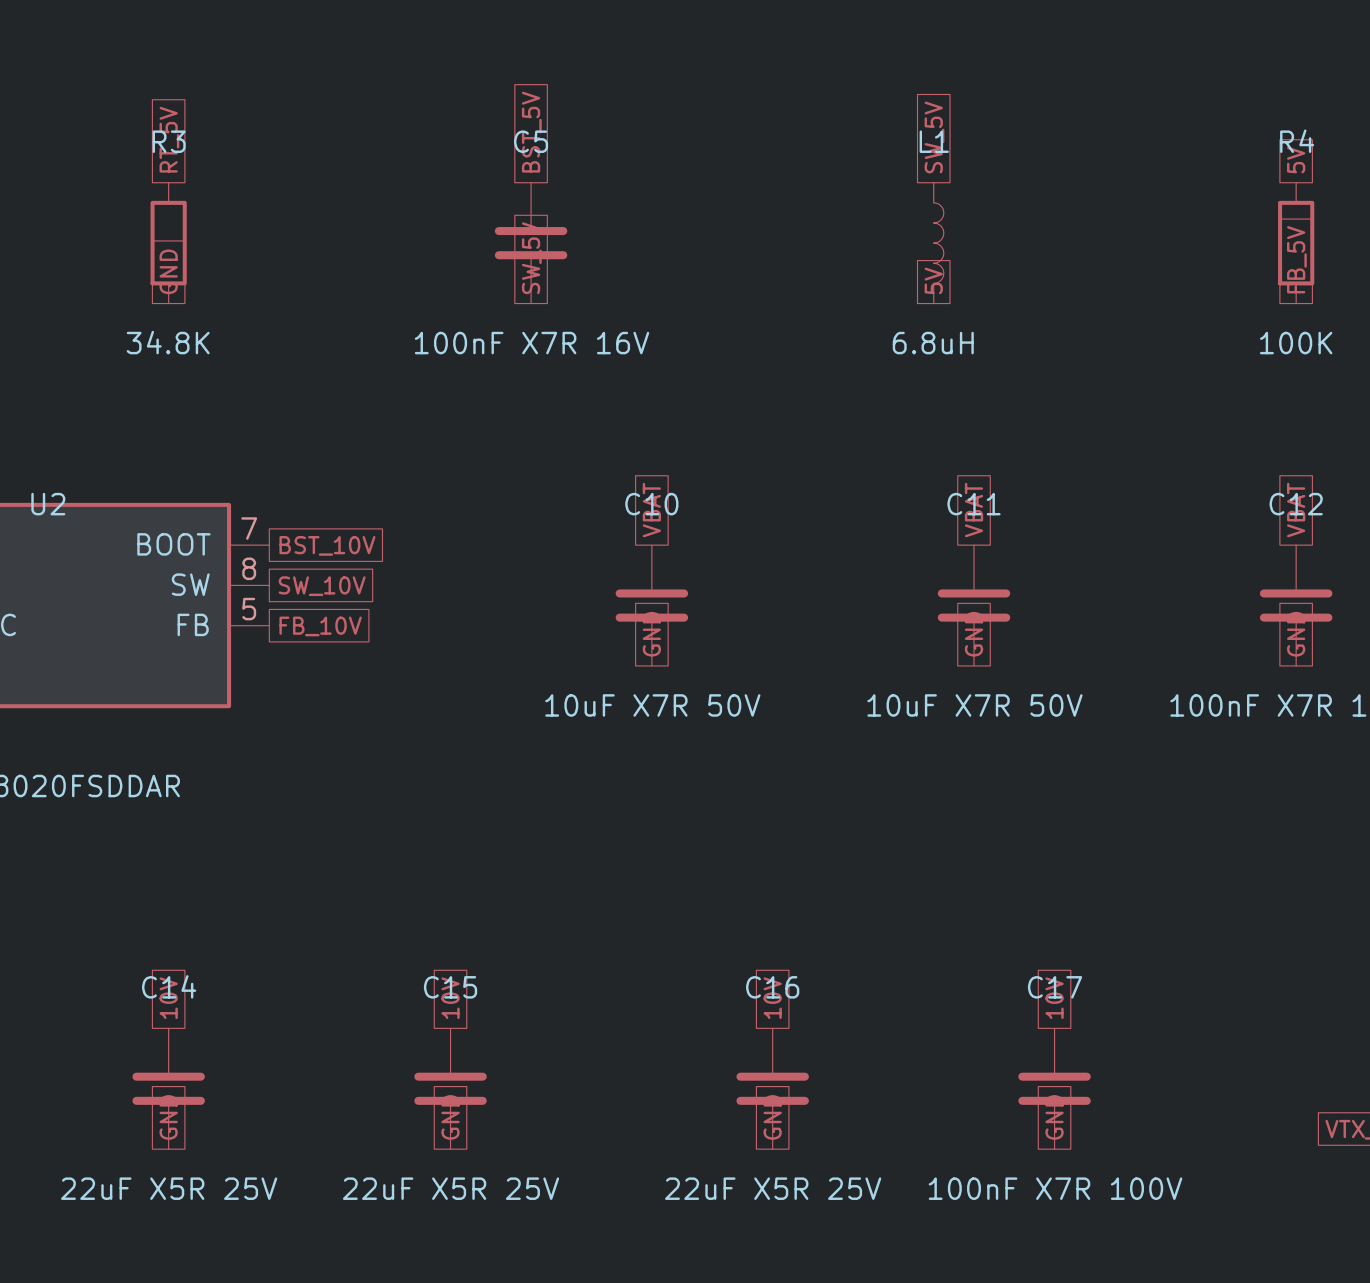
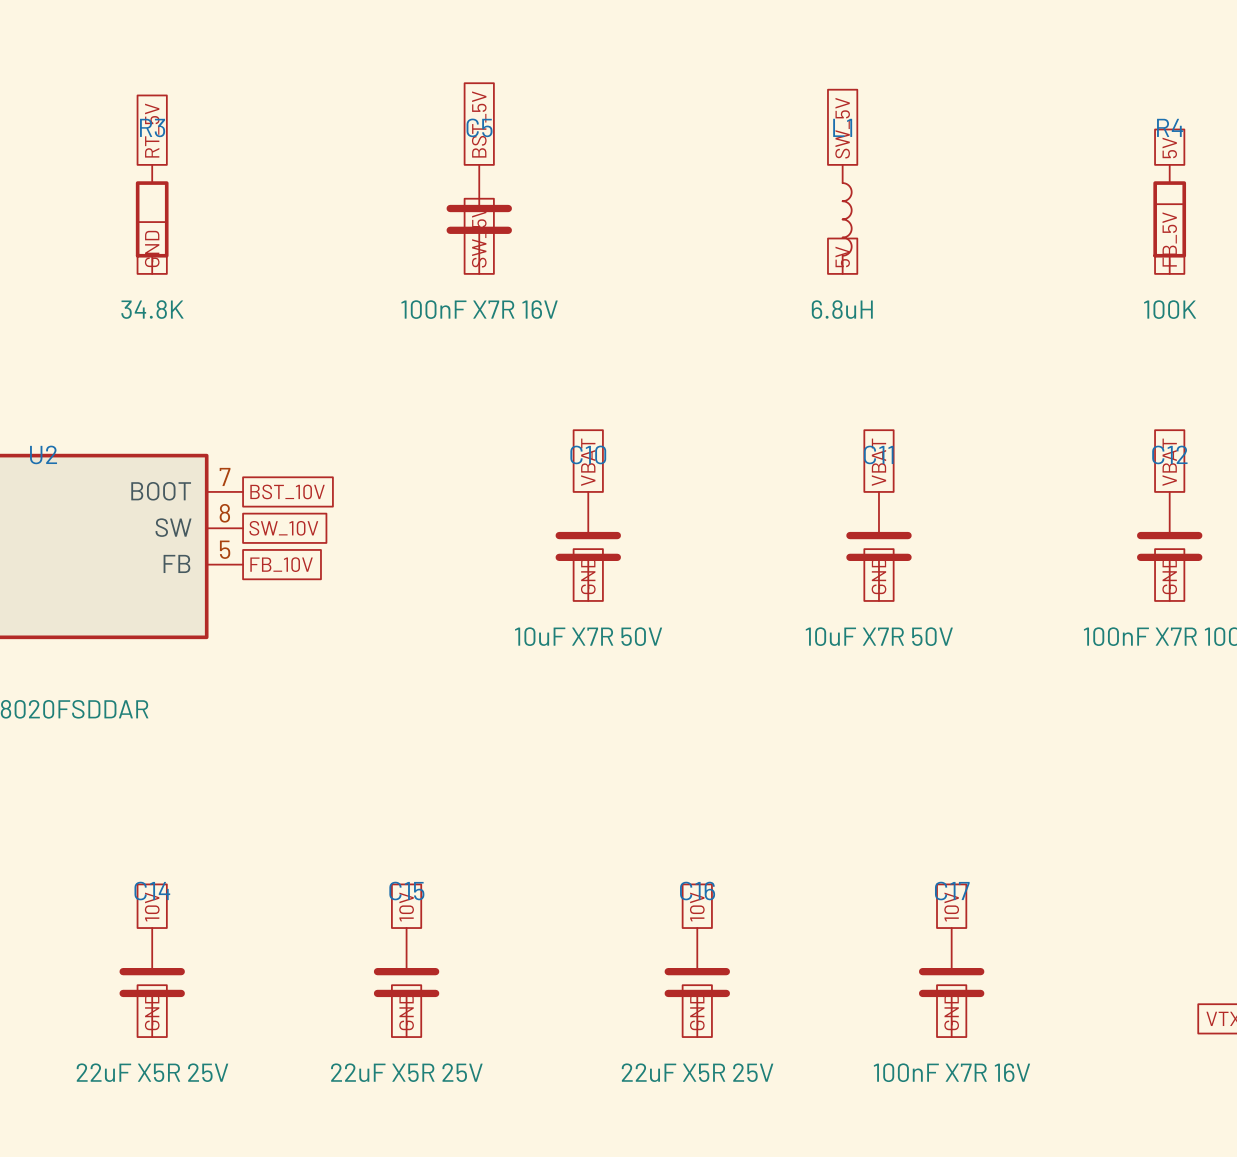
C17 value: 100nF X7R 100V (1055, 1188) -> 100nF X7R 16V (951, 1072)

